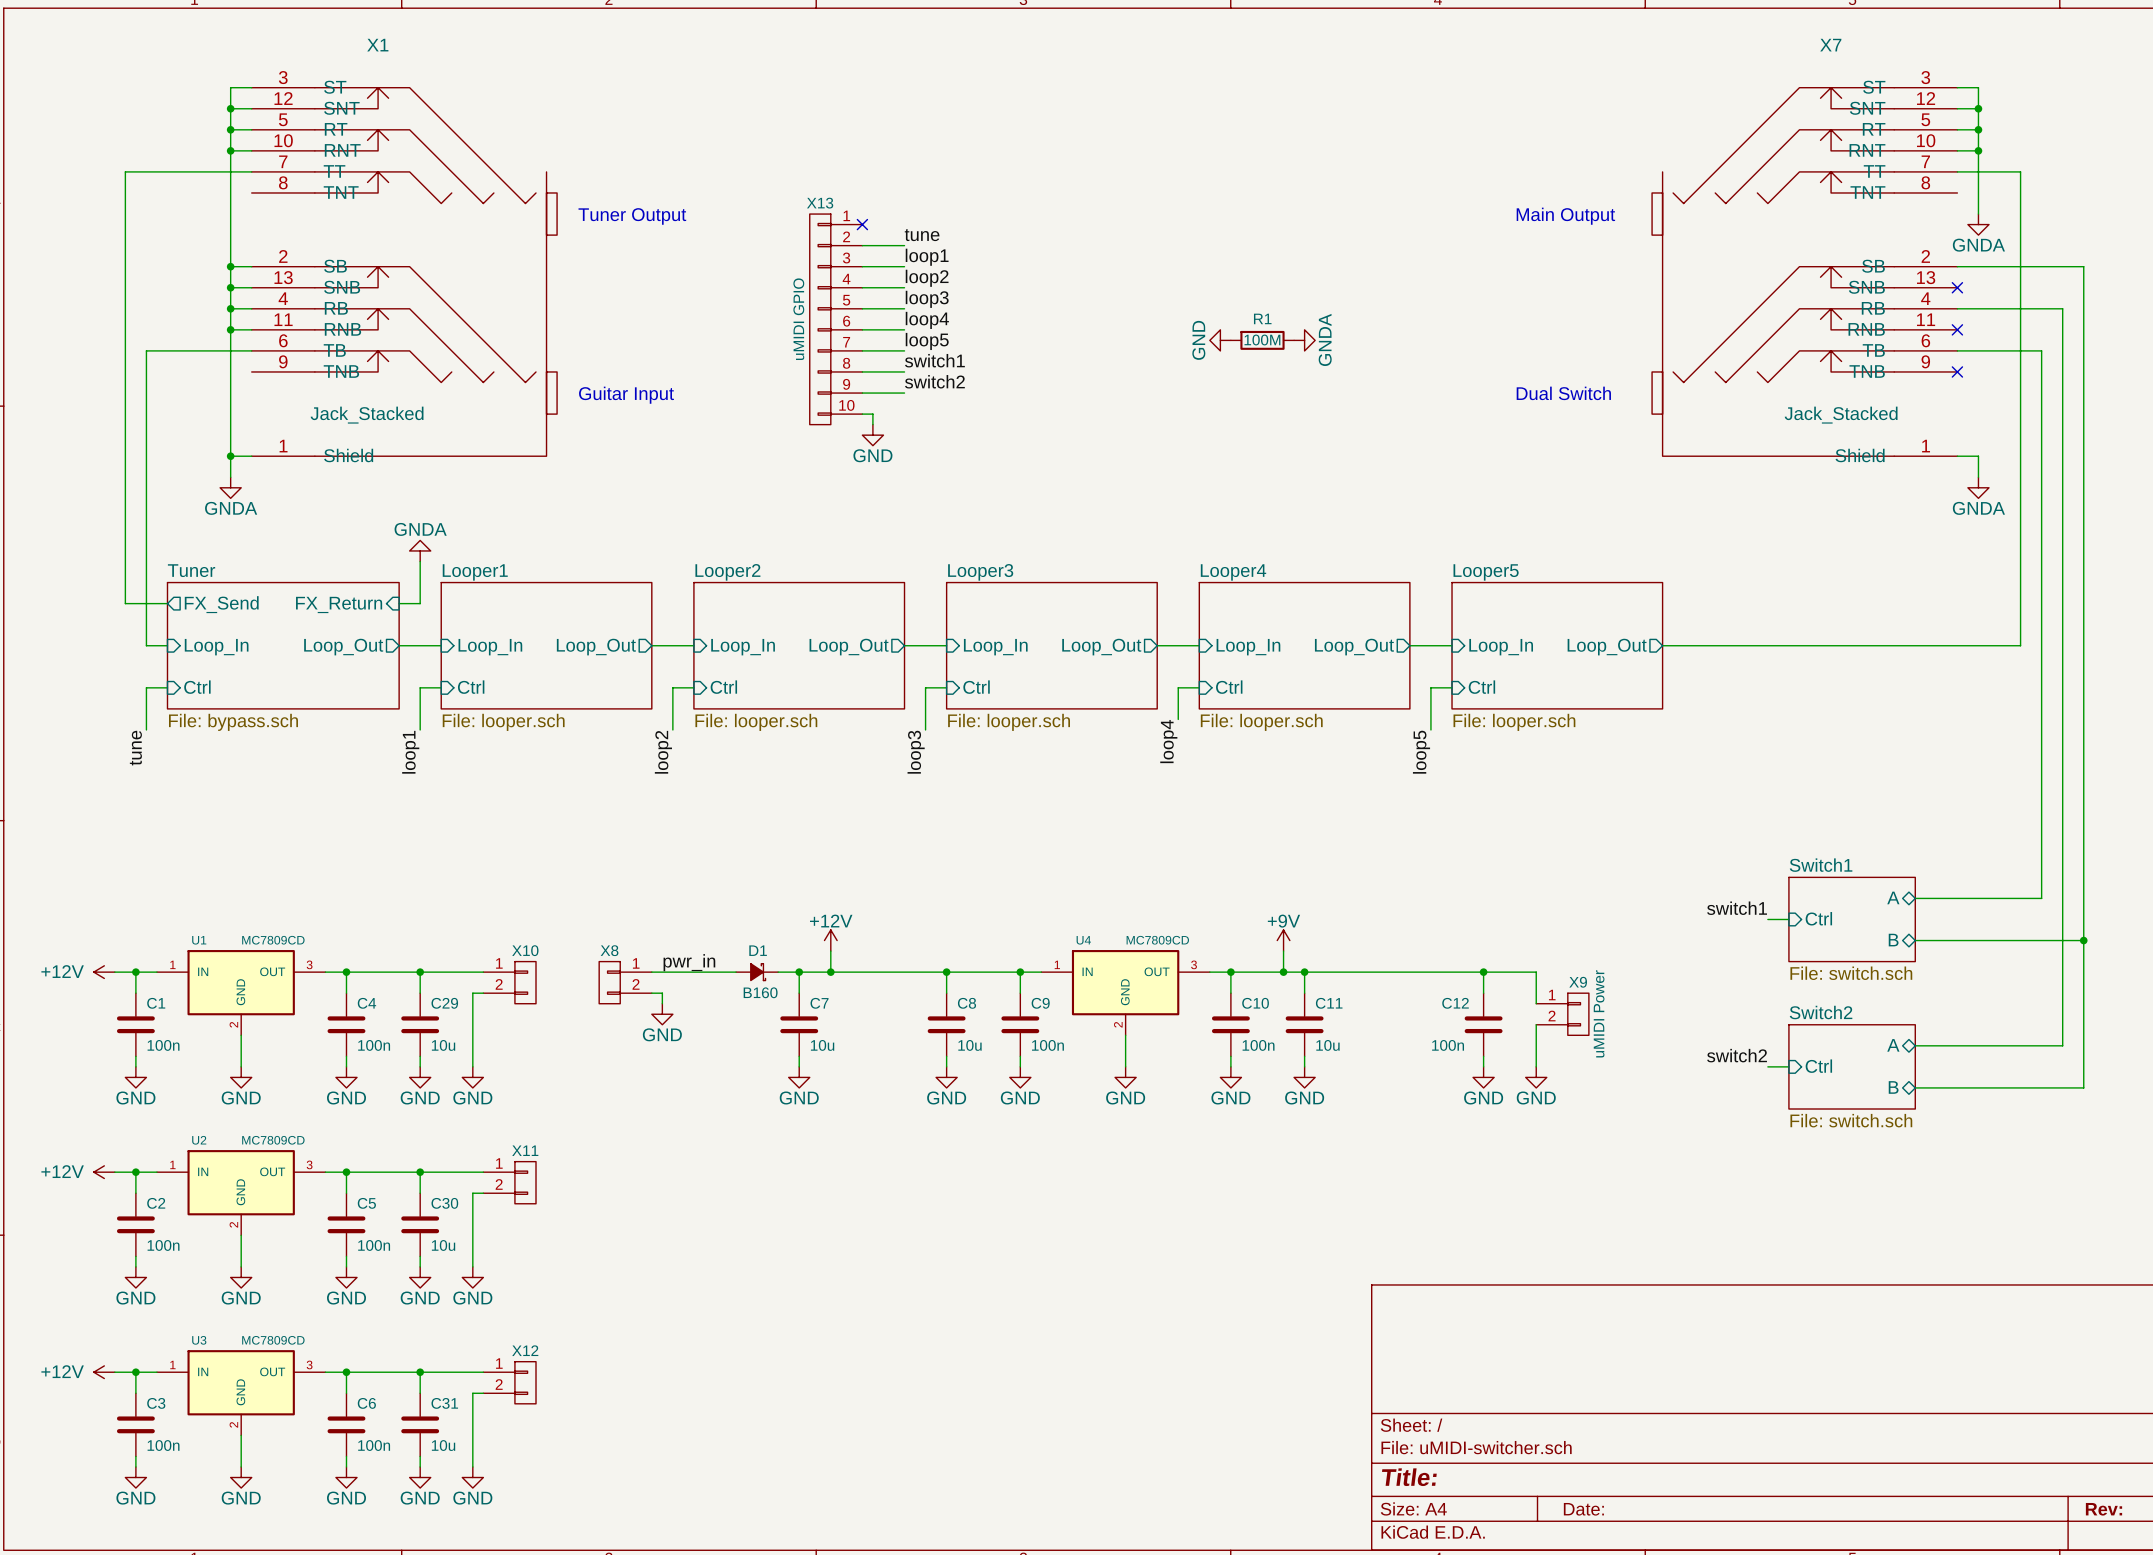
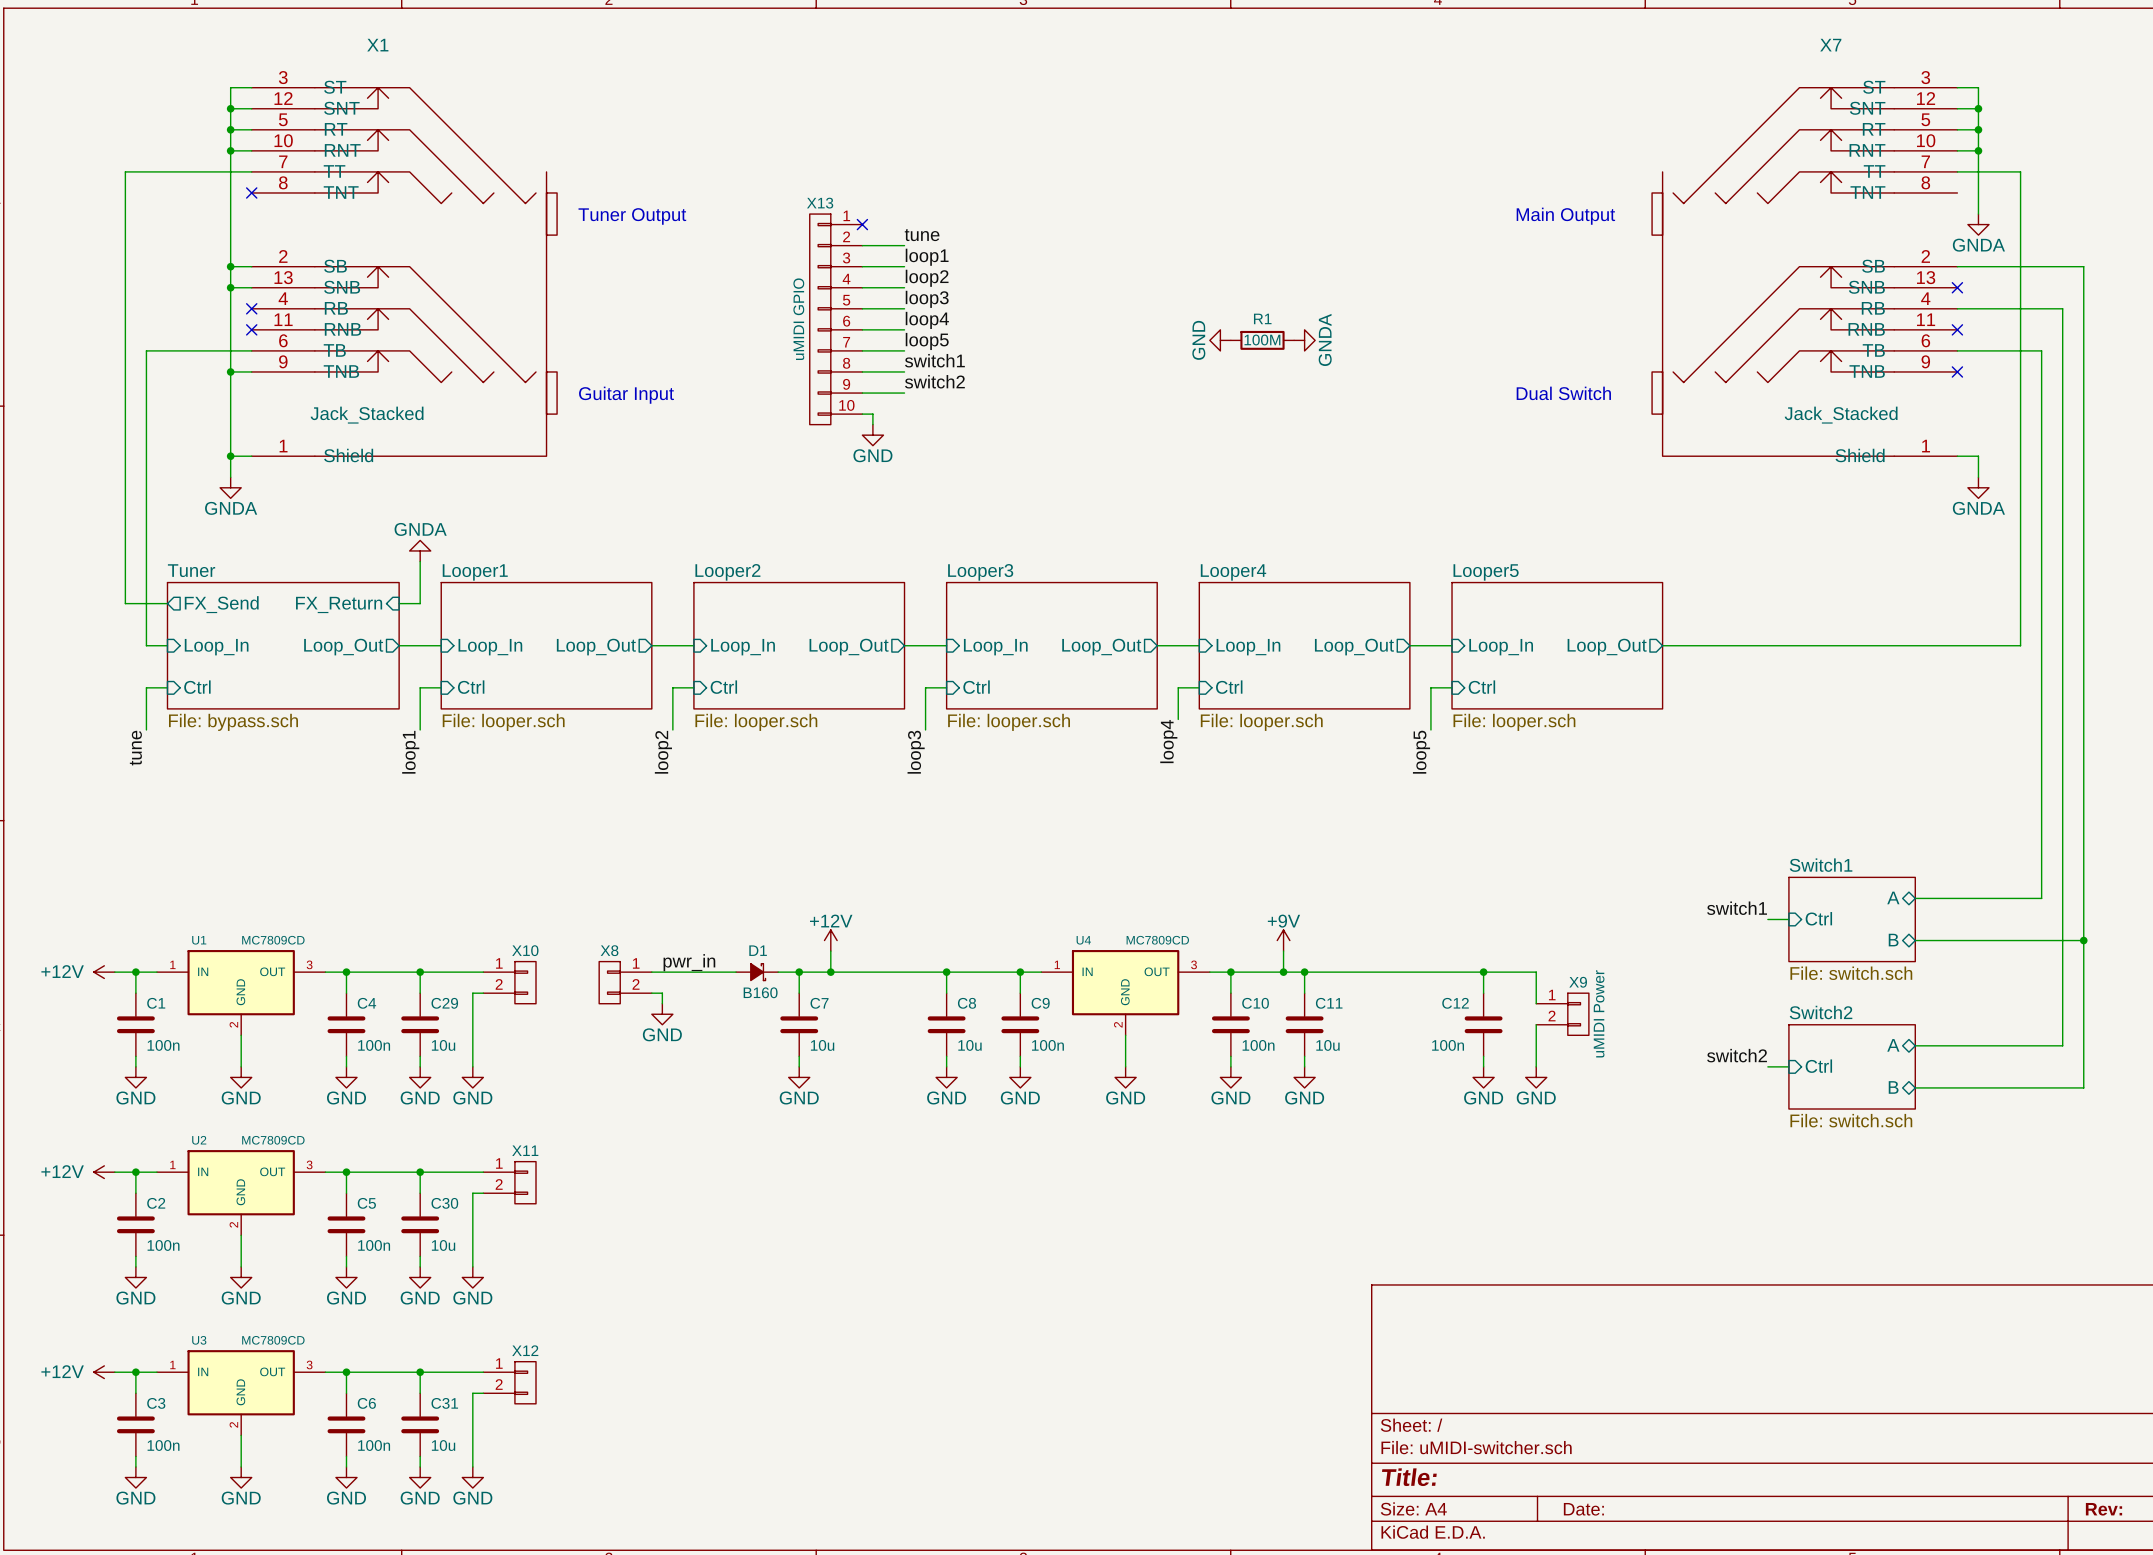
no-connect mark: none -> (251, 192)
wire: (230, 308) (251, 308) -> none
junction: (230, 308) -> none
no-connect mark: none -> (251, 308)
wire: (230, 329) (251, 329) -> (230, 371) (251, 371)
junction: (230, 329) -> none
no-connect mark: none -> (251, 329)
junction: none -> (230, 371)

